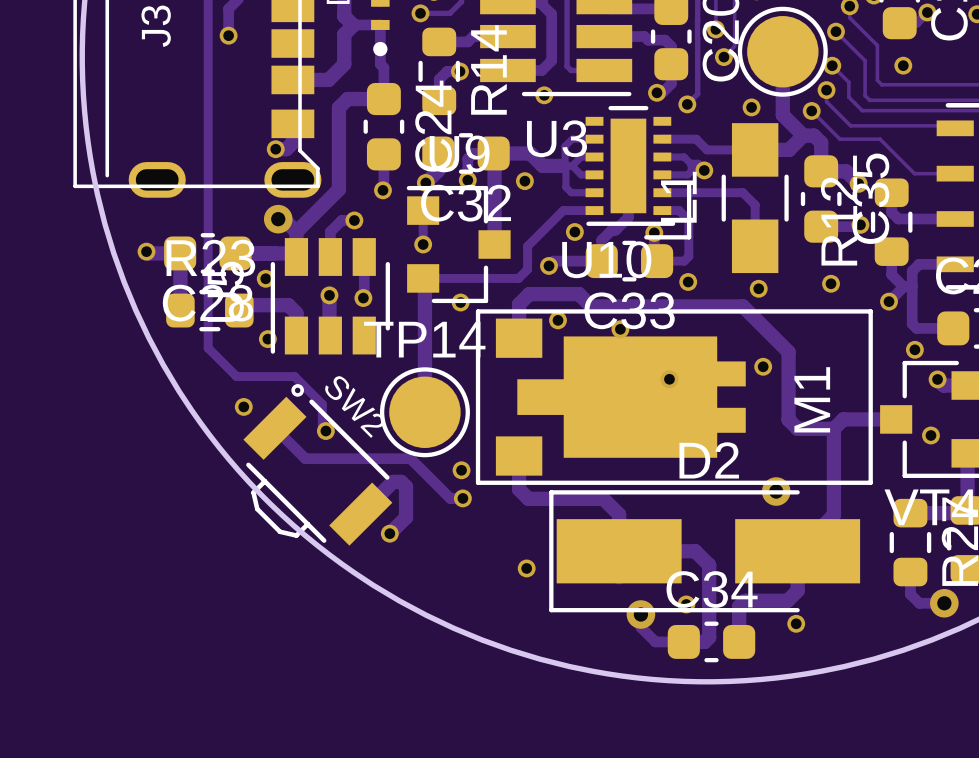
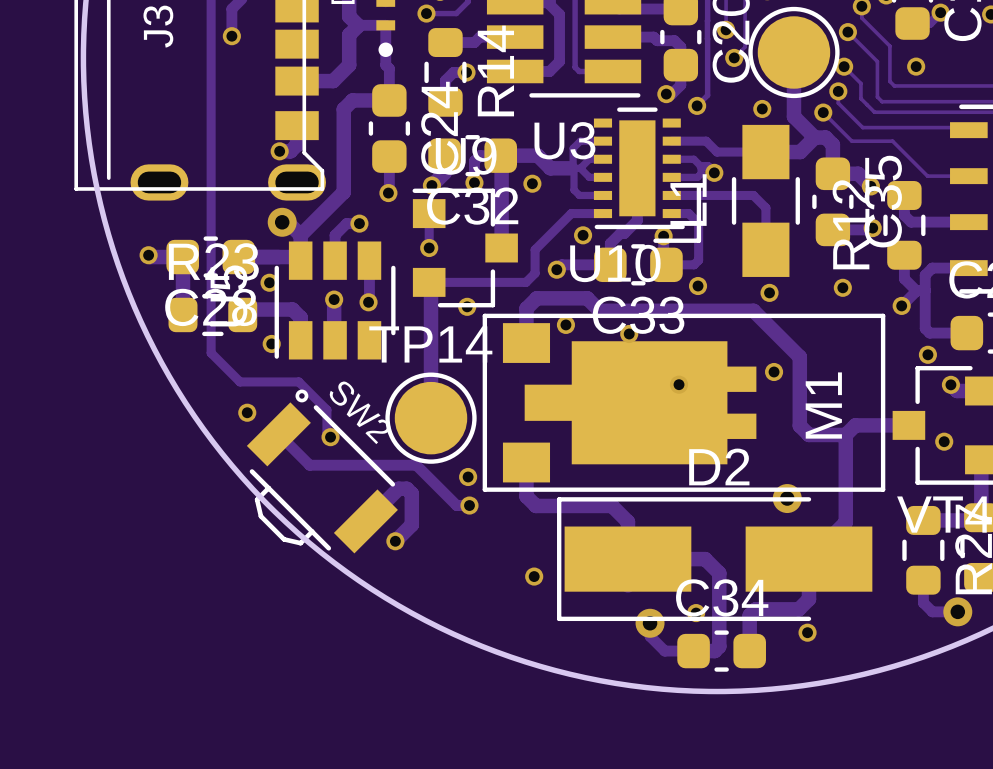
via: (544, 95) -> none

